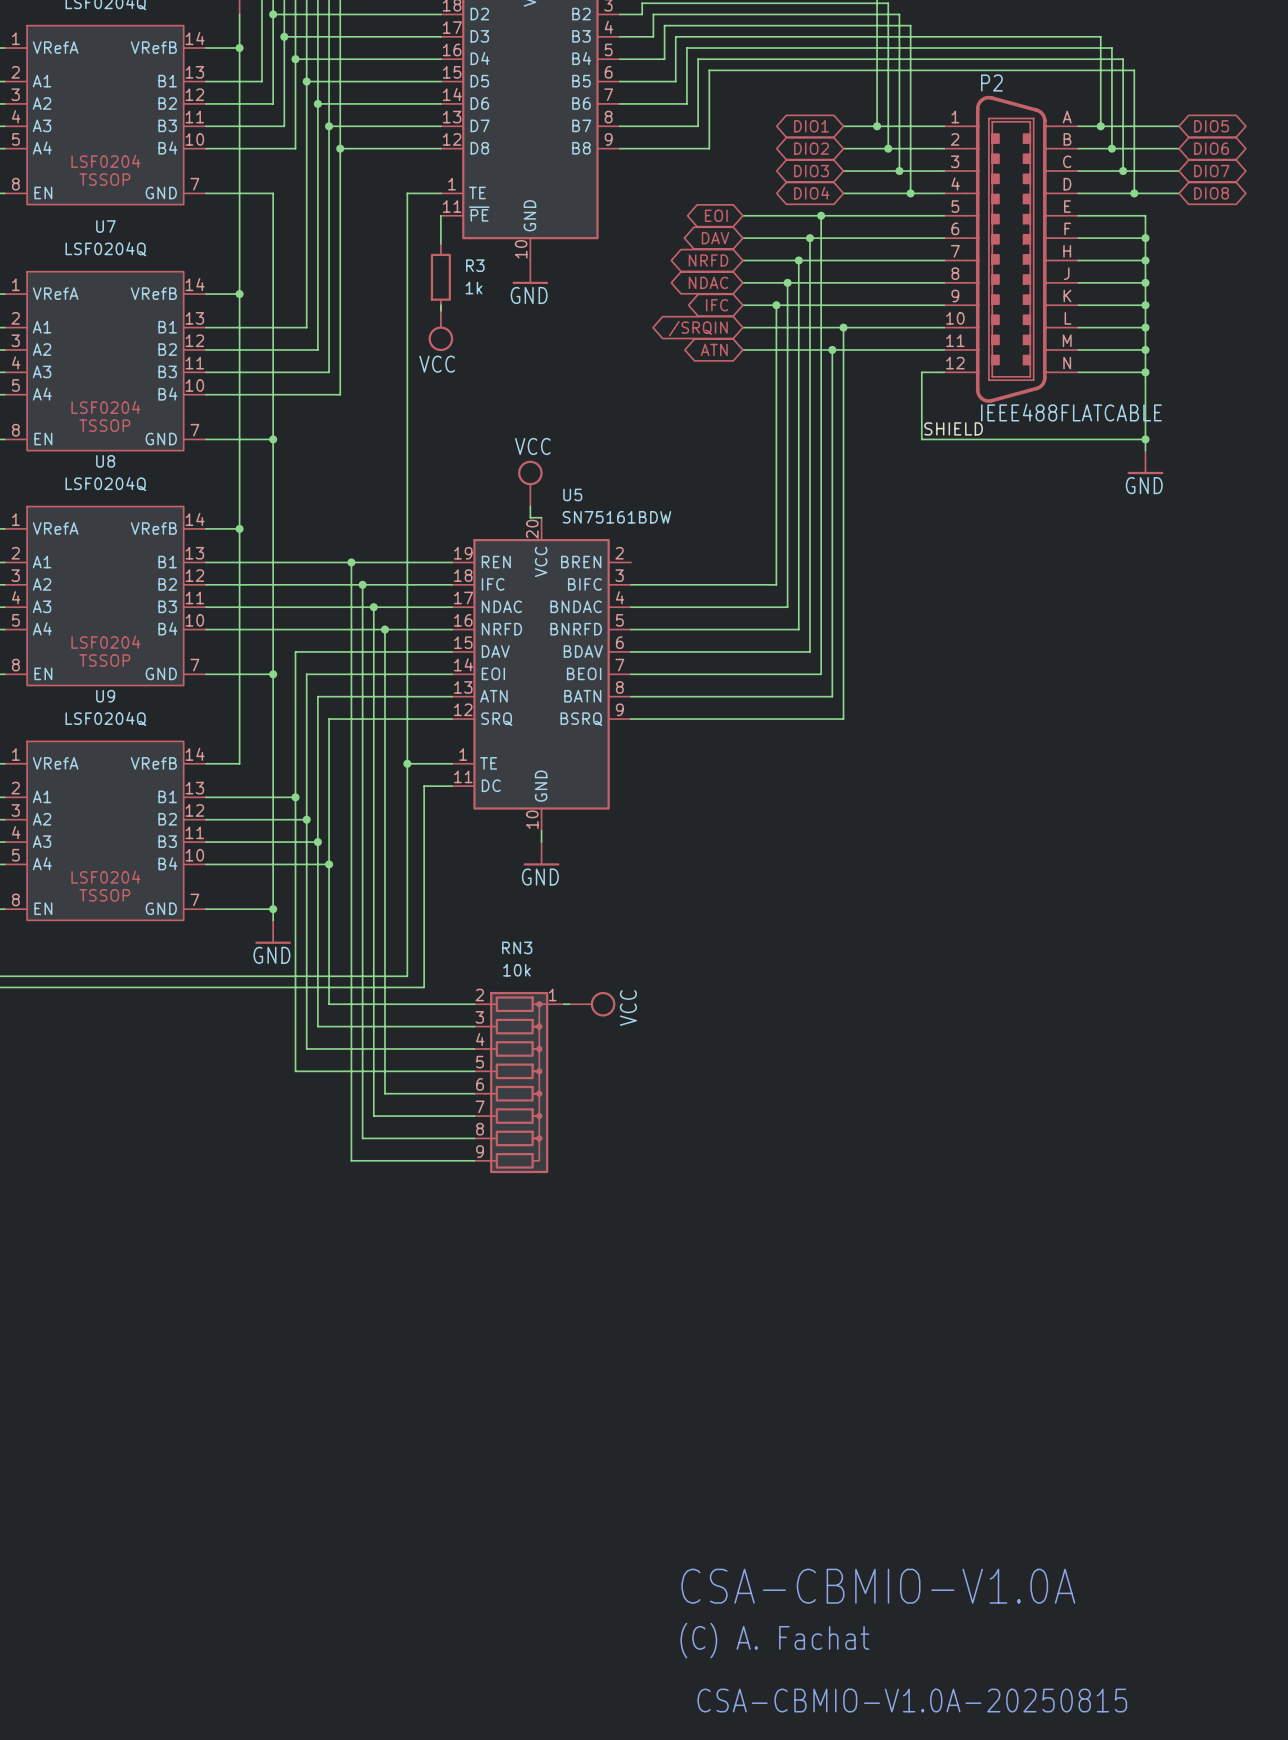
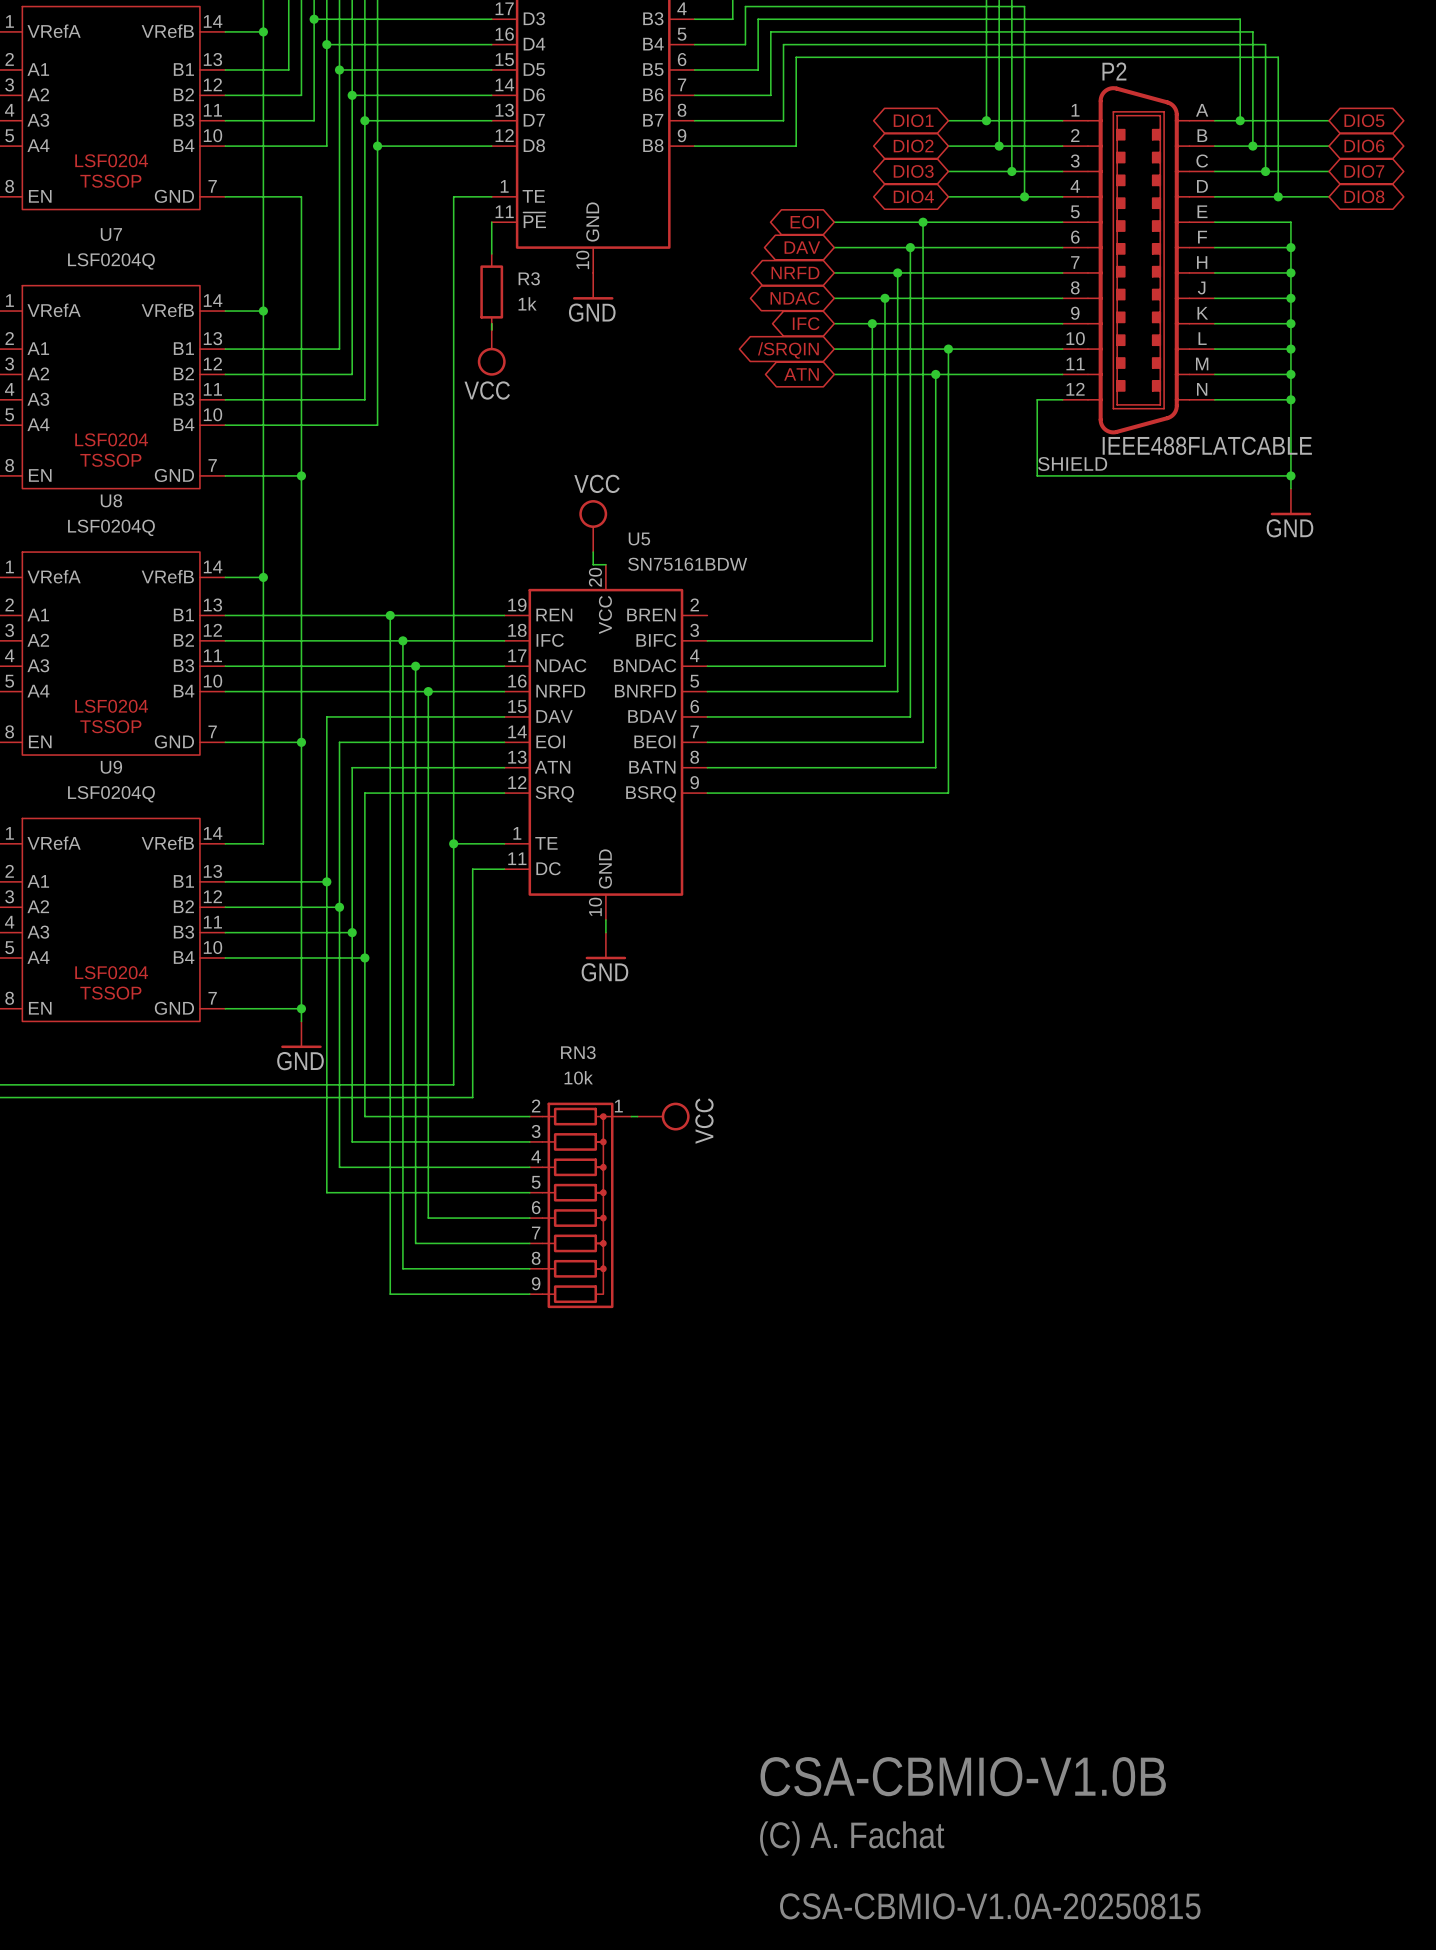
text: CSA-CBMIO-V1.0A (878, 1586) -> CSA-CBMIO-V1.0B (963, 1776)

